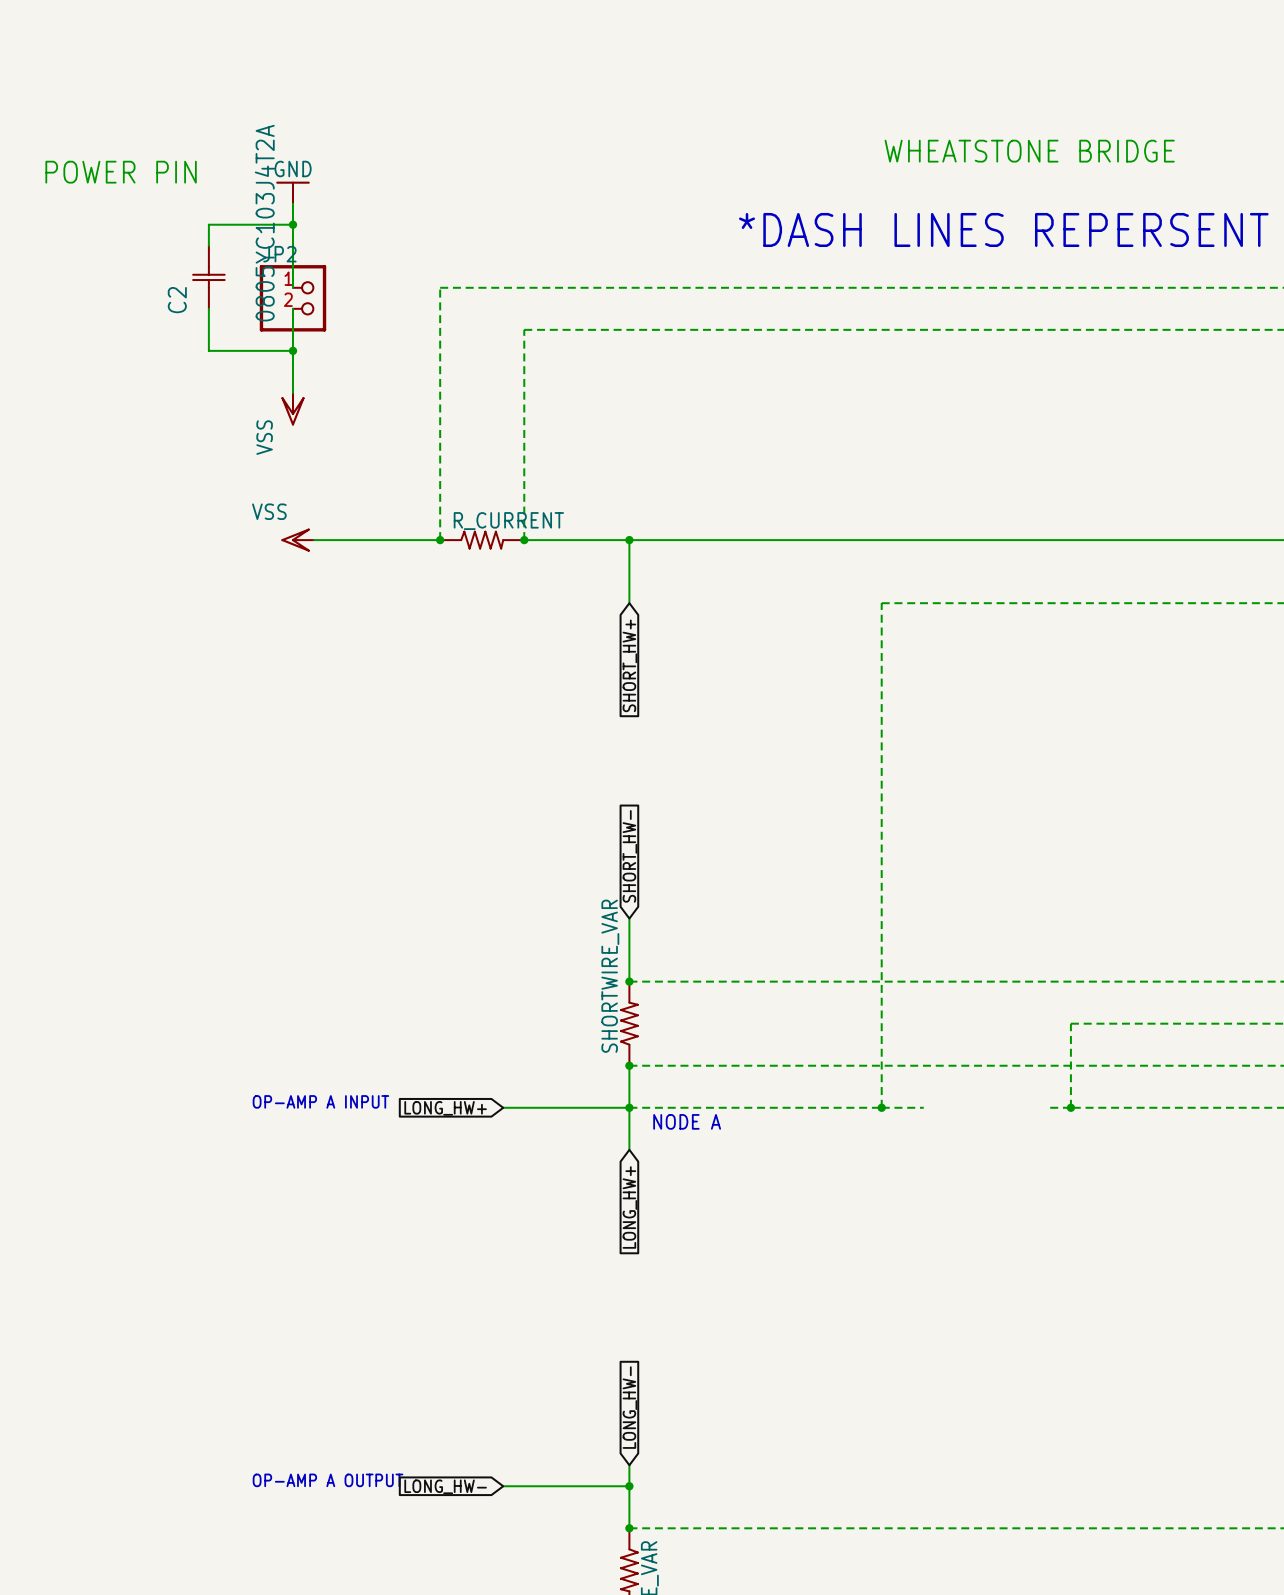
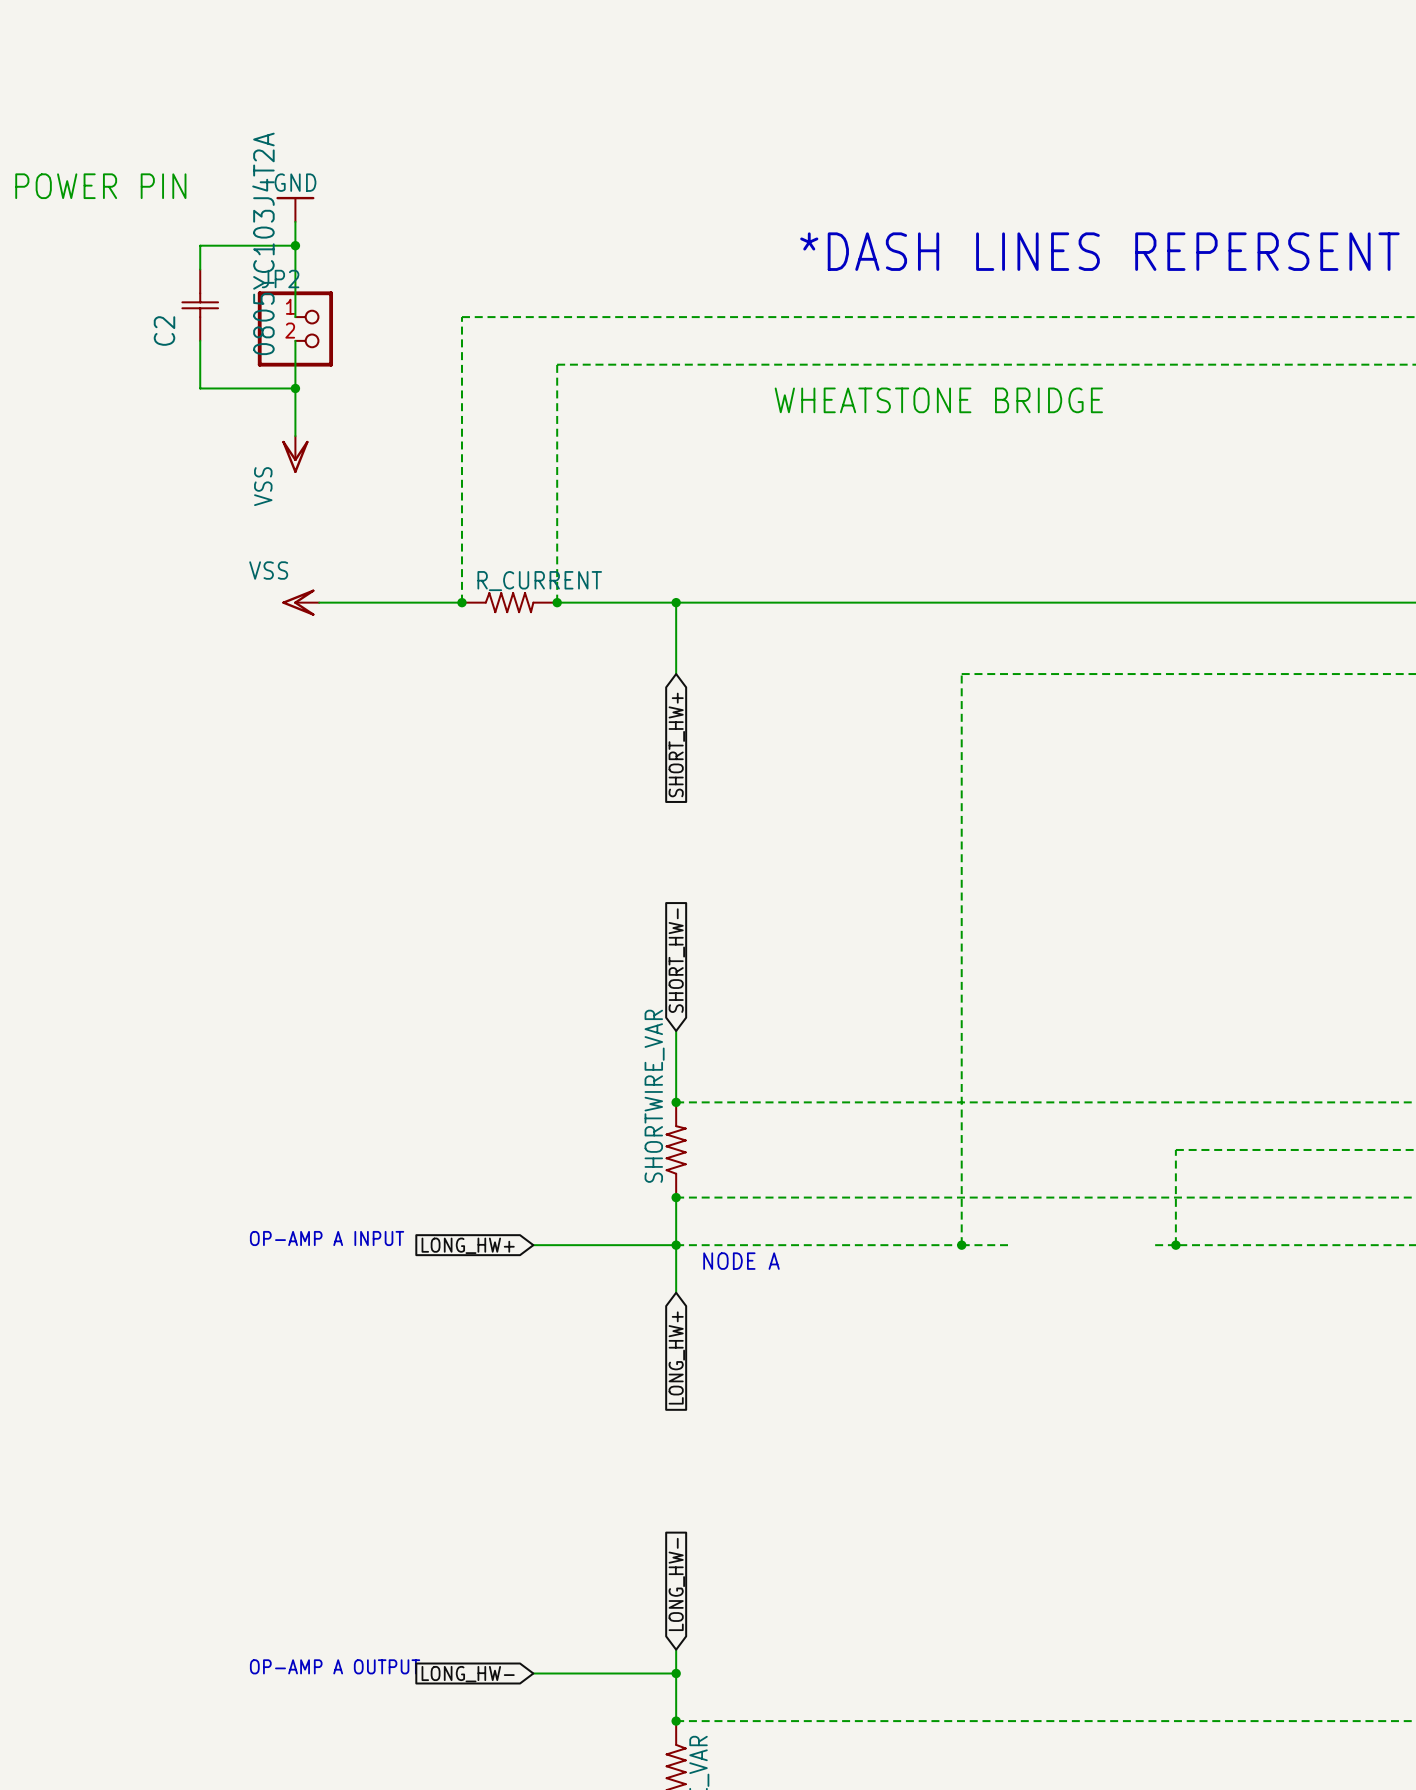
text: WHEATSTONE BRIDGE (1029, 151) -> none
text: none -> WHEATSTONE BRIDGE (938, 400)

